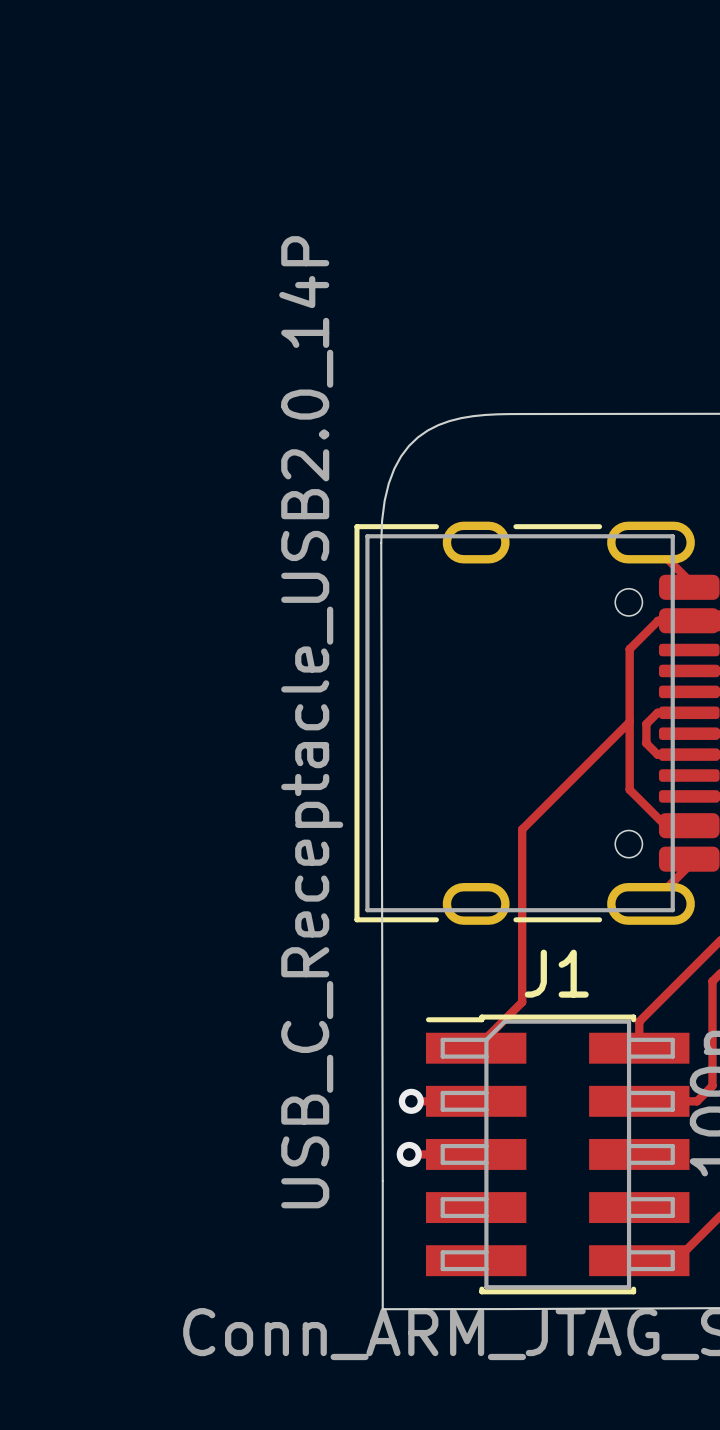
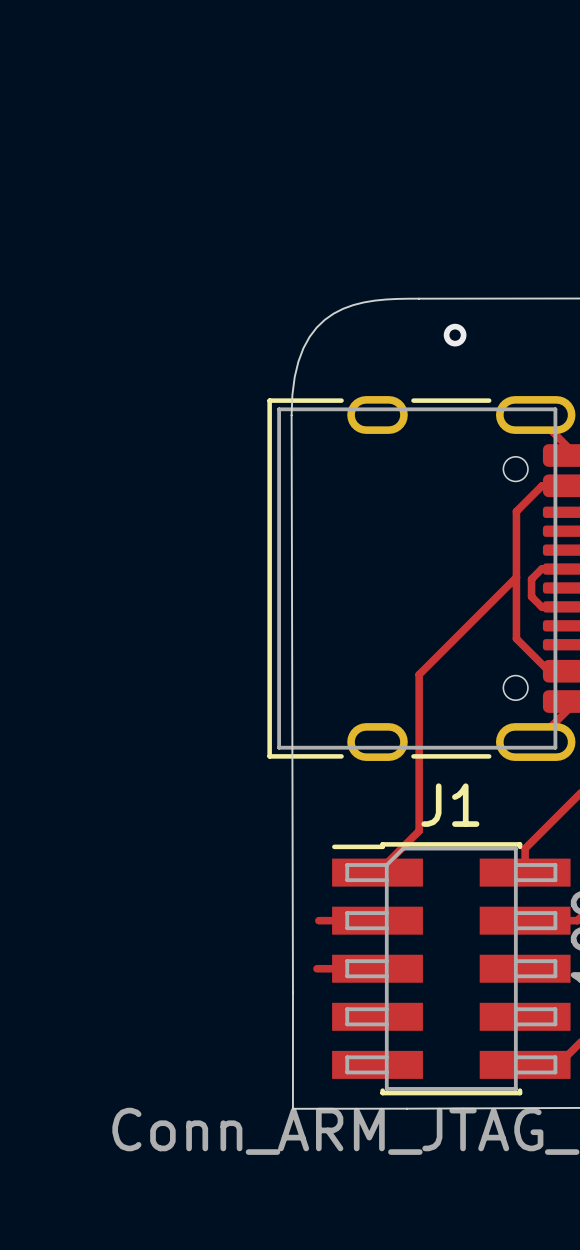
via: none -> (455, 335)
part value: USB_C_Receptacle_USB2.0_14P (311, 722) -> none
via: (411, 1101) -> none
via: (409, 1154) -> none

